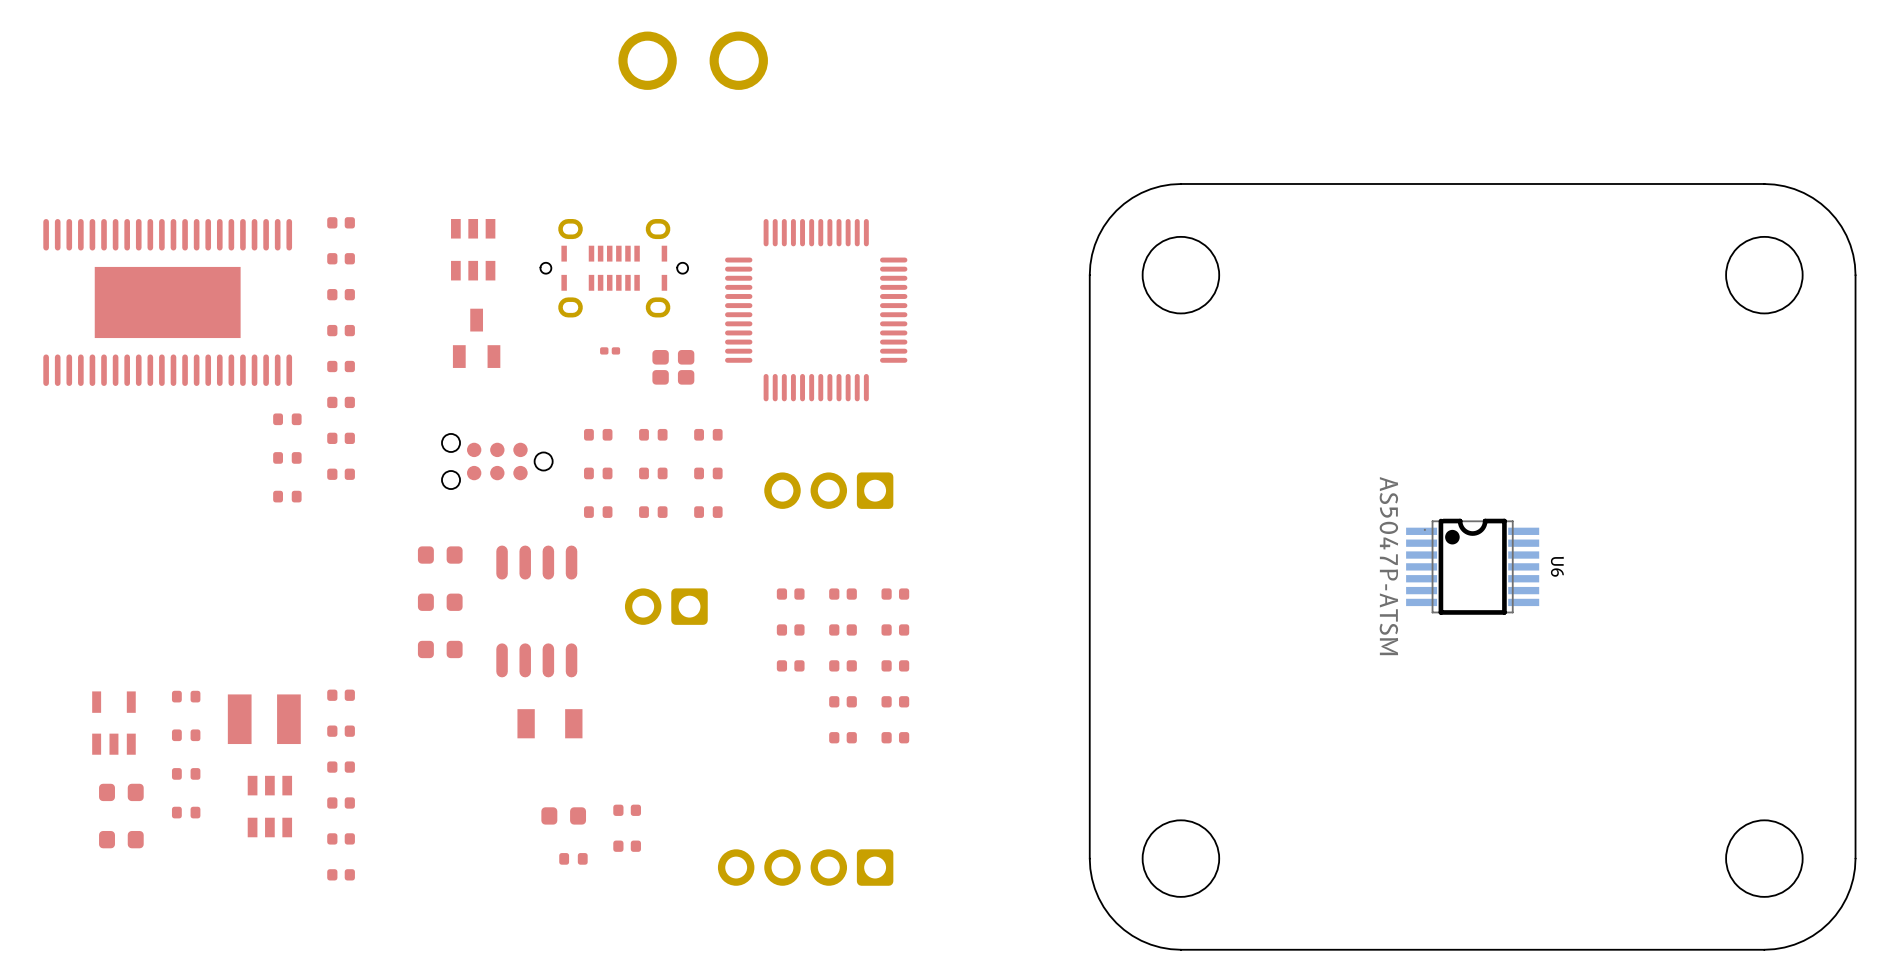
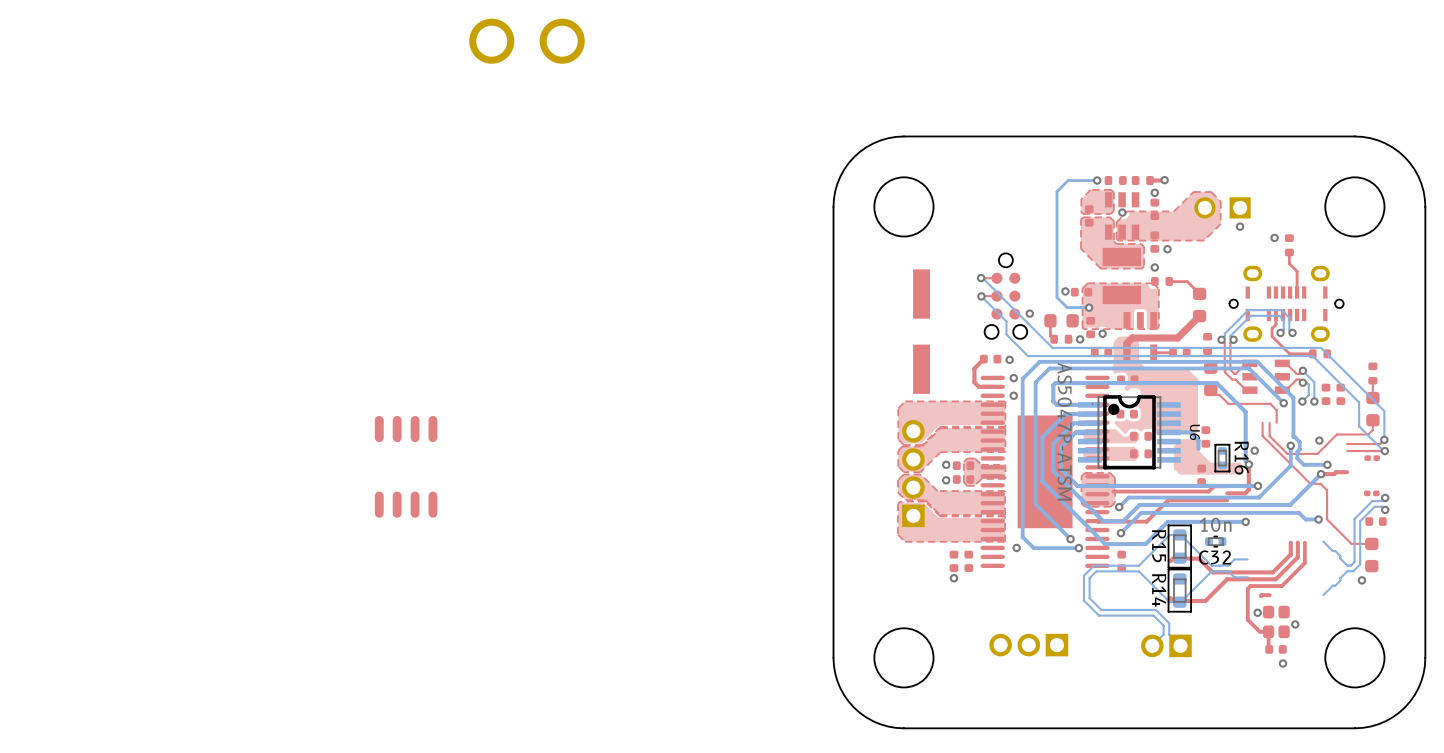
part: (341, 222) -> none
bottom track: none -> (1097, 180) (1068, 180) (1056, 191) (1056, 297) (1067, 307) (1088, 307)
via: none -> (1097, 180)
part: none -> (1115, 180)
part: none -> (1142, 180)
top track: none -> (1164, 180) (1149, 180)
via: none -> (1164, 180)
part: (473, 249) -> none
top zone outline: none -> (1111, 189) (1113, 192) (1113, 210) (1110, 213) (1081, 212) (1081, 199) (1090, 189) (1111, 189)
top zone outline: none -> (1211, 191) (1193, 191) (1174, 211) (1127, 211) (1116, 222) (1116, 238) (1118, 240) (1204, 240) (1220, 223) (1220, 201) (1211, 191)
via: none -> (1154, 192)
part: (341, 258) -> none
part: (614, 268) -> none
part: none -> (1222, 207)
part: none -> (1154, 209)
via: none -> (1122, 212)
part: none -> (1089, 215)
part: none -> (1122, 215)
top zone outline: none -> (1109, 217) (1113, 221) (1113, 241) (1116, 243) (1141, 243) (1144, 246) (1144, 266) (1141, 268) (1100, 268) (1080, 248) (1080, 219) (1083, 217) (1109, 217)
part: (341, 294) -> none
via: none -> (1240, 226)
part: (167, 302) -> none
part: (816, 310) -> none
via: none -> (1274, 237)
part: none -> (1154, 242)
part: none -> (1289, 245)
via: none -> (1167, 249)
part: (341, 330) -> none
top track: none -> (1289, 252) (1289, 263) (1297, 271) (1297, 292)
part: (476, 338) -> none
part: (610, 350) -> none
via: none -> (1154, 267)
part: none -> (1121, 275)
part: (341, 366) -> none
part: (673, 367) -> none
bottom track: none -> (981, 278) (1052, 347) (1321, 347) (1384, 411) (1384, 439)
via: none -> (981, 278)
top track: none -> (996, 278) (981, 278)
part: none -> (1162, 281)
top track: none -> (1169, 281) (1187, 281) (1199, 293)
top zone outline: none -> (1153, 283) (1087, 283) (1082, 288) (1082, 327) (1084, 329) (1156, 329) (1158, 326) (1158, 289) (1153, 283)
via: none -> (1065, 291)
part: none -> (1081, 292)
bottom track: none -> (981, 296) (1006, 321) (1006, 334) (1028, 356) (1312, 356) (1359, 402) (1359, 426) (1384, 451)
via: none -> (981, 296)
top track: none -> (996, 296) (981, 296)
part: none -> (1005, 296)
part: none -> (1286, 303)
part: (341, 402) -> none
part: none -> (1199, 305)
via: none -> (1089, 307)
via: none -> (1029, 313)
top track: none -> (1275, 315) (1275, 324) (1272, 328) (1272, 336) (1289, 353) (1312, 353)
top track: none -> (1199, 316) (1177, 337) (1132, 337) (1126, 343) (1126, 352)
part: (287, 419) -> none
top track: none -> (1050, 320) (1050, 335) (1054, 339)
part: none -> (1061, 320)
part: none -> (1090, 327)
part: (598, 434) -> none
part: (653, 434) -> none
part: (708, 434) -> none
part: none -> (921, 331)
part: (341, 438) -> none
bottom track: none -> (1280, 332) (1283, 329) (1283, 320) (1279, 315) (1250, 315) (1230, 336) (1233, 339)
via: none -> (1280, 332)
bottom track: none -> (1292, 332) (1289, 329) (1289, 317) (1281, 310) (1248, 310) (1224, 333) (1221, 339)
via: none -> (1292, 332)
via: none -> (1102, 333)
part: none -> (1140, 336)
part: none -> (1061, 339)
via: none -> (1080, 339)
top track: none -> (1221, 339) (1224, 342) (1224, 372) (1246, 390) (1249, 390)
via: none -> (1221, 339)
top track: none -> (1233, 339) (1230, 342) (1230, 369) (1235, 373) (1246, 363) (1249, 363)
via: none -> (1233, 339)
part: none -> (1207, 343)
part: (287, 457) -> none
part: (497, 461) -> none
part: none -> (1101, 352)
top track: none -> (1173, 352) (1153, 352)
part: none -> (1179, 352)
part: none -> (1320, 353)
top track: none -> (983, 359) (974, 368) (974, 382) (978, 386) (992, 386)
part: none -> (990, 359)
via: none -> (1009, 359)
part: (598, 473) -> none
part: (653, 473) -> none
part: (708, 473) -> none
part: (341, 474) -> none
top track: none -> (1282, 363) (1286, 363) (1296, 373) (1302, 370)
bottom track: none -> (1302, 370) (1314, 382) (1314, 401)
via: none -> (1302, 370)
part: (828, 490) -> none
part: none -> (1372, 373)
part: none -> (1266, 376)
part: (287, 496) -> none
via: none -> (1013, 378)
part: none -> (1210, 378)
part: none -> (1127, 379)
top track: none -> (1372, 380) (1372, 398)
top track: none -> (1302, 382) (1296, 379) (1286, 390) (1282, 390)
bottom track: none -> (1302, 382) (1308, 384) (1308, 395) (1302, 401)
via: none -> (1302, 382)
top track: none -> (1210, 389) (1213, 394) (1219, 394) (1228, 403) (1270, 403) (1276, 410) (1276, 422)
part: (598, 512) -> none
part: (653, 512) -> none
part: (708, 512) -> none
part: none -> (1326, 394)
part: none -> (1340, 394)
via: none -> (1013, 395)
top zone outline: none -> (1005, 401) (1005, 426) (940, 426) (922, 445) (903, 445) (898, 439) (898, 408) (905, 401) (1005, 401)
via: none -> (1302, 401)
via: none -> (1314, 401)
bottom track: none -> (1283, 403) (1249, 368) (1049, 368) (1035, 382) (1035, 504) (1070, 539)
via: none -> (1283, 403)
bottom track: none -> (1089, 404) (1056, 404) (1053, 401) (1053, 385) (1055, 383) (1216, 383) (1245, 411) (1245, 461) (1248, 464)
part: none -> (1372, 409)
bottom track: none -> (1089, 414) (1065, 414) (1042, 437) (1042, 481) (1105, 544) (1145, 544) (1167, 521) (1245, 521)
part: none -> (1127, 414)
top track: none -> (1372, 420) (1372, 429) (1368, 434) (1336, 434) (1317, 453) (1287, 453) (1269, 436) (1269, 422)
top track: none -> (1262, 422) (1262, 436) (1310, 483) (1320, 483) (1327, 490) (1326, 519) (1351, 543) (1371, 543)
part: (440, 555) -> none
bottom track: none -> (1089, 423) (1073, 423) (1053, 443) (1053, 471) (1103, 521) (1123, 521) (1139, 504) (1290, 504) (1321, 474)
top zone outline: none -> (1005, 428) (1005, 452) (940, 452) (920, 472) (903, 472) (898, 466) (898, 450) (902, 446) (922, 446) (940, 428) (1005, 428)
bottom track: none -> (1089, 432) (1075, 432) (1061, 447) (1061, 469) (1077, 485) (1257, 485)
bottom track: none -> (1168, 432) (1190, 432) (1198, 440) (1198, 448)
part: none -> (1141, 436)
part: none -> (1205, 436)
top track: none -> (1384, 439) (1380, 444) (1347, 444)
via: none -> (1384, 439)
via: none -> (1319, 440)
bottom track: none -> (1290, 445) (1290, 465) (1258, 497) (1128, 497) (1119, 507)
via: none -> (1290, 445)
via: none -> (1254, 450)
top track: none -> (1384, 451) (1347, 451)
via: none -> (1384, 451)
part: (790, 594) -> none
part: (843, 594) -> none
part: (895, 594) -> none
part: none -> (1141, 453)
top zone outline: none -> (975, 458) (967, 458) (963, 461) (963, 482) (967, 485) (974, 485) (981, 478) (1005, 478) (1005, 464) (981, 464) (975, 458)
R16: none -> (1222, 458)
part: none -> (1372, 458)
part: (440, 602) -> none
part: (666, 606) -> none
via: none -> (946, 464)
top track: none -> (1248, 464) (1248, 489) (1245, 493) (1227, 493)
via: none -> (1248, 464)
bottom track: none -> (1327, 464) (1303, 464) (1297, 458) (1299, 442) (1293, 436) (1293, 397) (1257, 361) (1039, 361) (1022, 378) (1022, 537) (1033, 548) (1078, 548)
via: none -> (1327, 464)
part: none -> (963, 465)
part: none -> (1045, 471)
top track: none -> (1347, 472) (1321, 474)
top zone outline: none -> (1110, 472) (1114, 477) (1114, 502) (1110, 506) (1084, 506) (1081, 503) (1081, 476) (1085, 472) (1110, 472)
part: none -> (913, 473)
via: none -> (1321, 474)
top zone outline: none -> (920, 474) (937, 491) (1005, 491) (1005, 515) (940, 515) (925, 500) (905, 500) (898, 492) (898, 480) (903, 474) (920, 474)
part: none -> (1201, 475)
part: none -> (963, 479)
via: none -> (946, 480)
part: (790, 629) -> none
part: (843, 629) -> none
part: (895, 629) -> none
top track: none -> (1227, 486) (1213, 486) (1208, 491) (1113, 491)
via: none -> (1257, 485)
part: none -> (1371, 493)
part: (440, 649) -> none
bottom track: none -> (1385, 497) (1382, 501) (1372, 501) (1354, 518) (1354, 562) (1351, 565) (1347, 565) (1340, 558) (1340, 555) (1323, 541)
via: none -> (1385, 497)
top track: none -> (1227, 500) (1168, 500) (1146, 521) (1097, 521)
top zone outline: none -> (925, 501) (940, 516) (1005, 516) (1005, 541) (905, 541) (898, 534) (898, 503) (900, 501) (925, 501)
via: none -> (1119, 507)
part: (790, 665) -> none
part: (843, 665) -> none
part: (895, 665) -> none
bottom track: none -> (1385, 509) (1382, 506) (1374, 506) (1360, 521) (1360, 564) (1353, 571) (1347, 571) (1340, 578) (1340, 580) (1323, 595)
via: none -> (1385, 509)
bottom track: none -> (1318, 519) (1305, 519) (1299, 512) (1141, 512) (1120, 533)
via: none -> (1318, 519)
via: none -> (1245, 521)
part: none -> (1376, 521)
part: (341, 695) -> none
part: (186, 696) -> none
via: none -> (1120, 533)
part: (843, 701) -> none
part: (895, 701) -> none
via: none -> (1070, 539)
C32: none -> 10n (1215, 541)
top track: none -> (1290, 542) (1290, 554) (1272, 572) (1212, 572) (1198, 558) (1173, 558) (1170, 561)
top track: none -> (1297, 542) (1297, 557) (1275, 579) (1227, 579) (1205, 601) (1173, 601) (1170, 598)
top track: none -> (1304, 542) (1304, 563) (1281, 586) (1250, 586) (1247, 588) (1247, 619) (1259, 631) (1268, 631) (1269, 649)
R15: none -> (1179, 546)
via: none -> (1016, 547)
via: none -> (1078, 548)
part: (264, 719) -> none
part: (113, 723) -> none
part: (549, 723) -> none
part: none -> (1371, 554)
part: (341, 731) -> none
bottom track: none -> (1247, 559) (1234, 559) (1228, 565) (1219, 565)
part: none -> (953, 561)
part: none -> (968, 561)
part: none -> (1121, 561)
part: (186, 735) -> none
part: (843, 737) -> none
part: (895, 737) -> none
bottom track: none -> (1219, 565) (1211, 565) (1180, 534) (1169, 534) (1138, 565) (1094, 565) (1083, 575) (1083, 600) (1099, 615) (1153, 615) (1163, 625) (1163, 634) (1152, 645)
bottom track: none -> (1221, 571) (1228, 571) (1234, 577) (1247, 577)
bottom track: none -> (1221, 571) (1211, 571) (1180, 602) (1169, 602) (1138, 571) (1096, 571) (1089, 578) (1089, 598) (1101, 609) (1155, 609) (1169, 623) (1169, 634) (1180, 645)
via: none -> (953, 578)
via: none -> (1361, 580)
part: (341, 767) -> none
R14: none -> (1179, 590)
part: (186, 773) -> none
top track: none -> (1269, 595) (1260, 595)
part: (121, 792) -> none
via: none -> (1257, 612)
part: (341, 802) -> none
part: (269, 806) -> none
part: (627, 810) -> none
part: (186, 812) -> none
part: none -> (1276, 621)
part: (563, 815) -> none
via: none -> (1295, 624)
part: (341, 838) -> none
part: (121, 839) -> none
part: none -> (1028, 645)
part: none -> (1166, 645)
part: (627, 846) -> none
part: none -> (1275, 649)
part: (573, 858) -> none
via: none -> (1283, 663)
part: (805, 867) -> none
part: (341, 874) -> none

